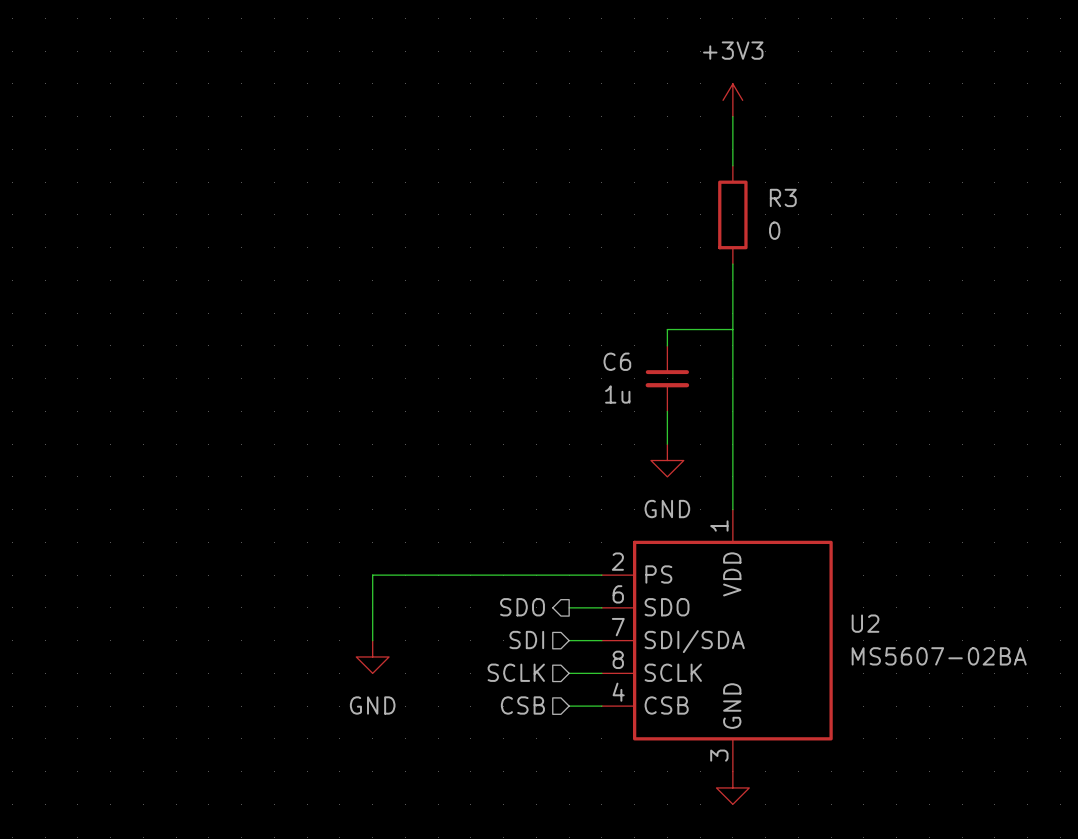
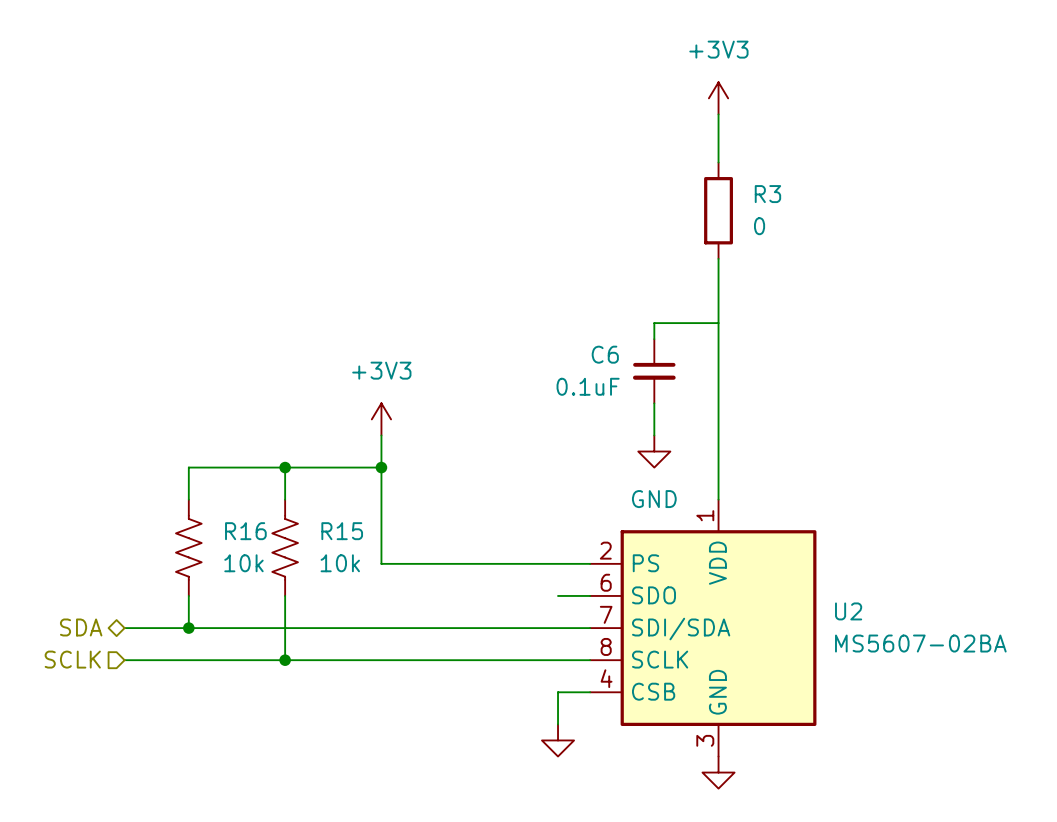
C6 value: 1u (617, 394) -> 0.1uF (588, 386)
power symbol: none -> +3V3 (381, 419)
wire: none -> (285, 467) (285, 499)
junction: none -> (285, 467)
wire: none -> (381, 467) (188, 467) (188, 499)
junction: none -> (381, 467)
R16: none -> 10k (188, 547)
R15: none -> 10k (285, 547)
wire: (389, 575) (372, 575) (372, 640) -> (381, 563) (381, 435)
wire: none -> (188, 595) (188, 628)
wire: none -> (285, 595) (285, 660)
hierarchical label: SDO (522, 607) -> none
hierarchical label: none -> SDA (81, 627)
wire: none -> (124, 628) (558, 628)
junction: none -> (188, 628)
hierarchical label: SDI (526, 640) -> none
power symbol: GND (372, 656) -> none
hierarchical label: none -> SCLK (72, 659)
hierarchical label: SCLK (516, 672) -> none
wire: none -> (124, 660) (558, 660)
junction: none -> (285, 660)
hierarchical label: CSB (522, 705) -> none
wire: none -> (558, 692) (558, 724)
power symbol: none -> (558, 740)

